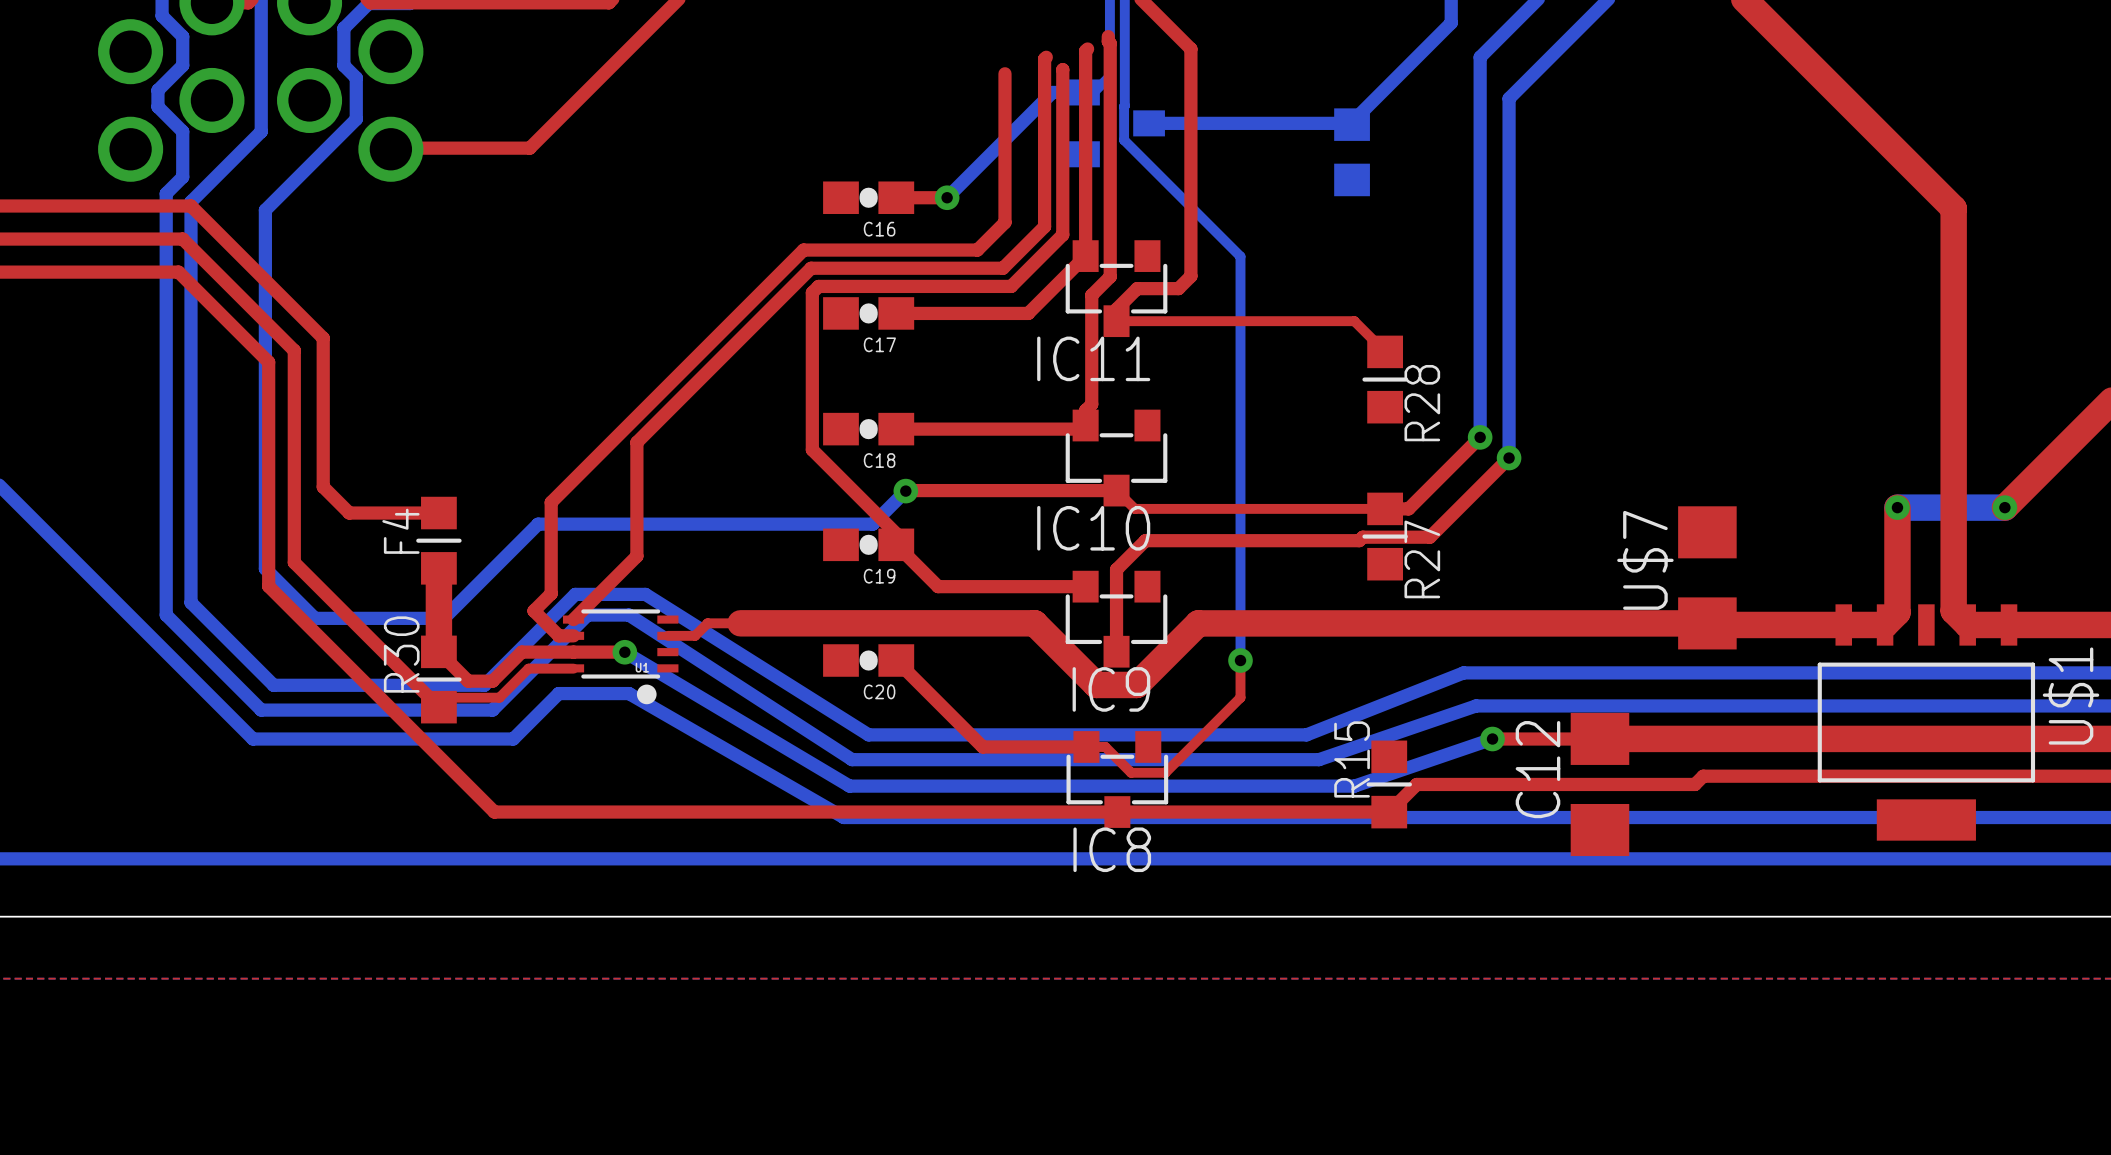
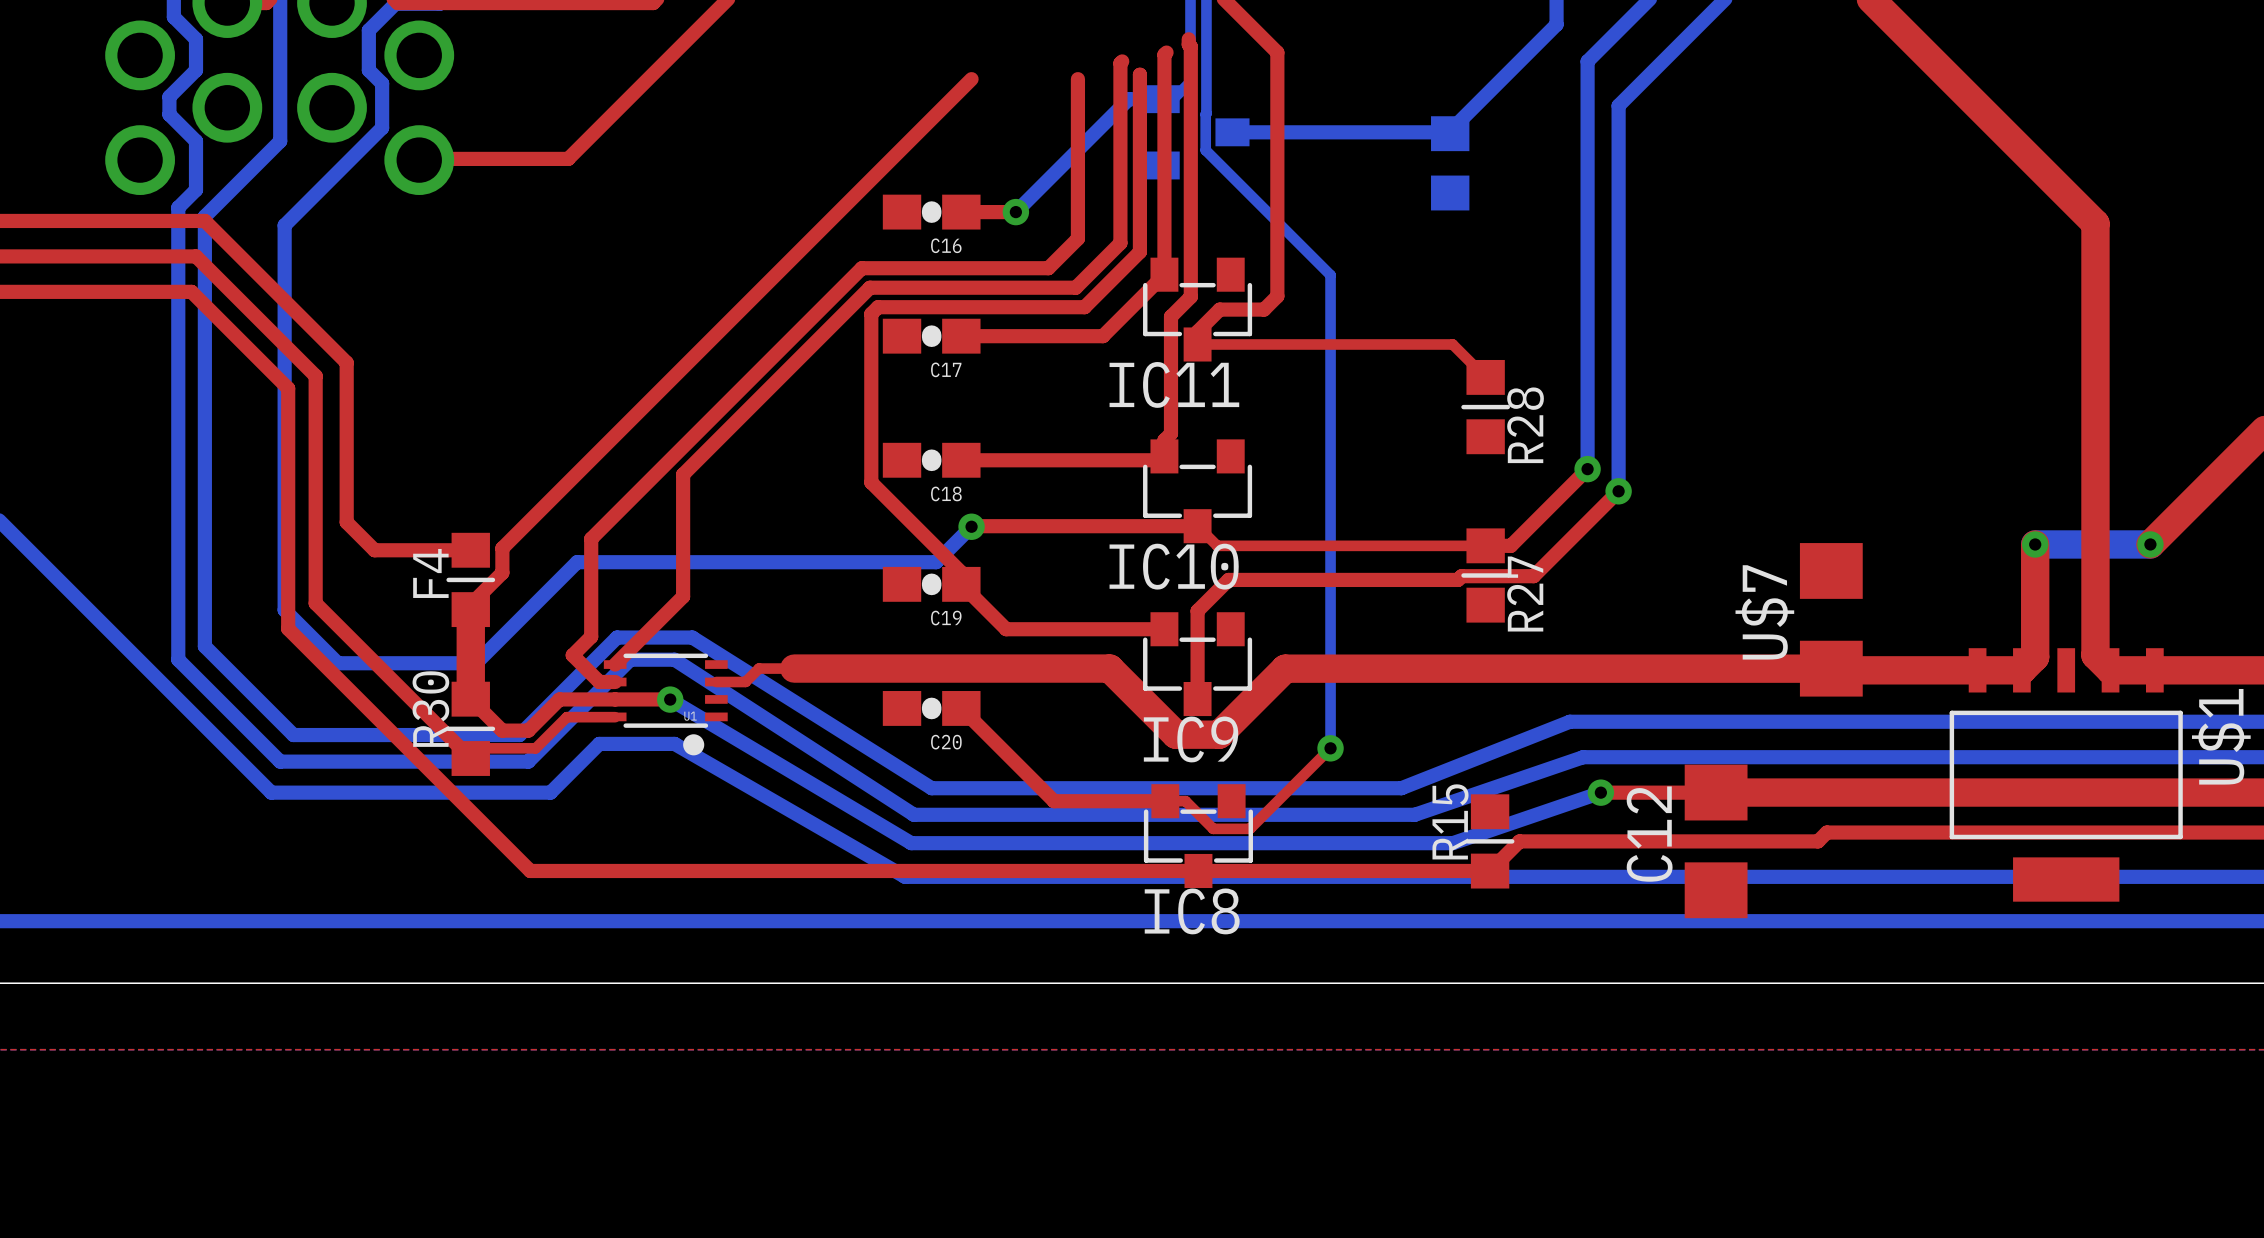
top track: none -> (971, 79) (502, 548) (502, 572) (470, 604) (470, 609)
top track: (1240, 660) (1240, 697) -> none
bottom track: none -> (1330, 708) (1330, 748)
via position: (1240, 660) -> (1330, 748)

